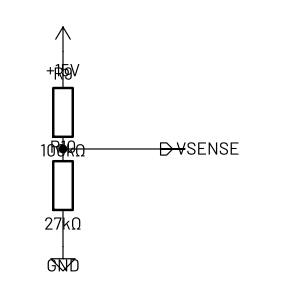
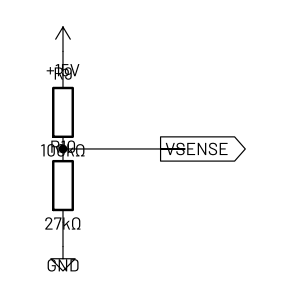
global label: none -> VSENSE (196, 148)
hierarchical label: VSENSE (207, 148) -> none

